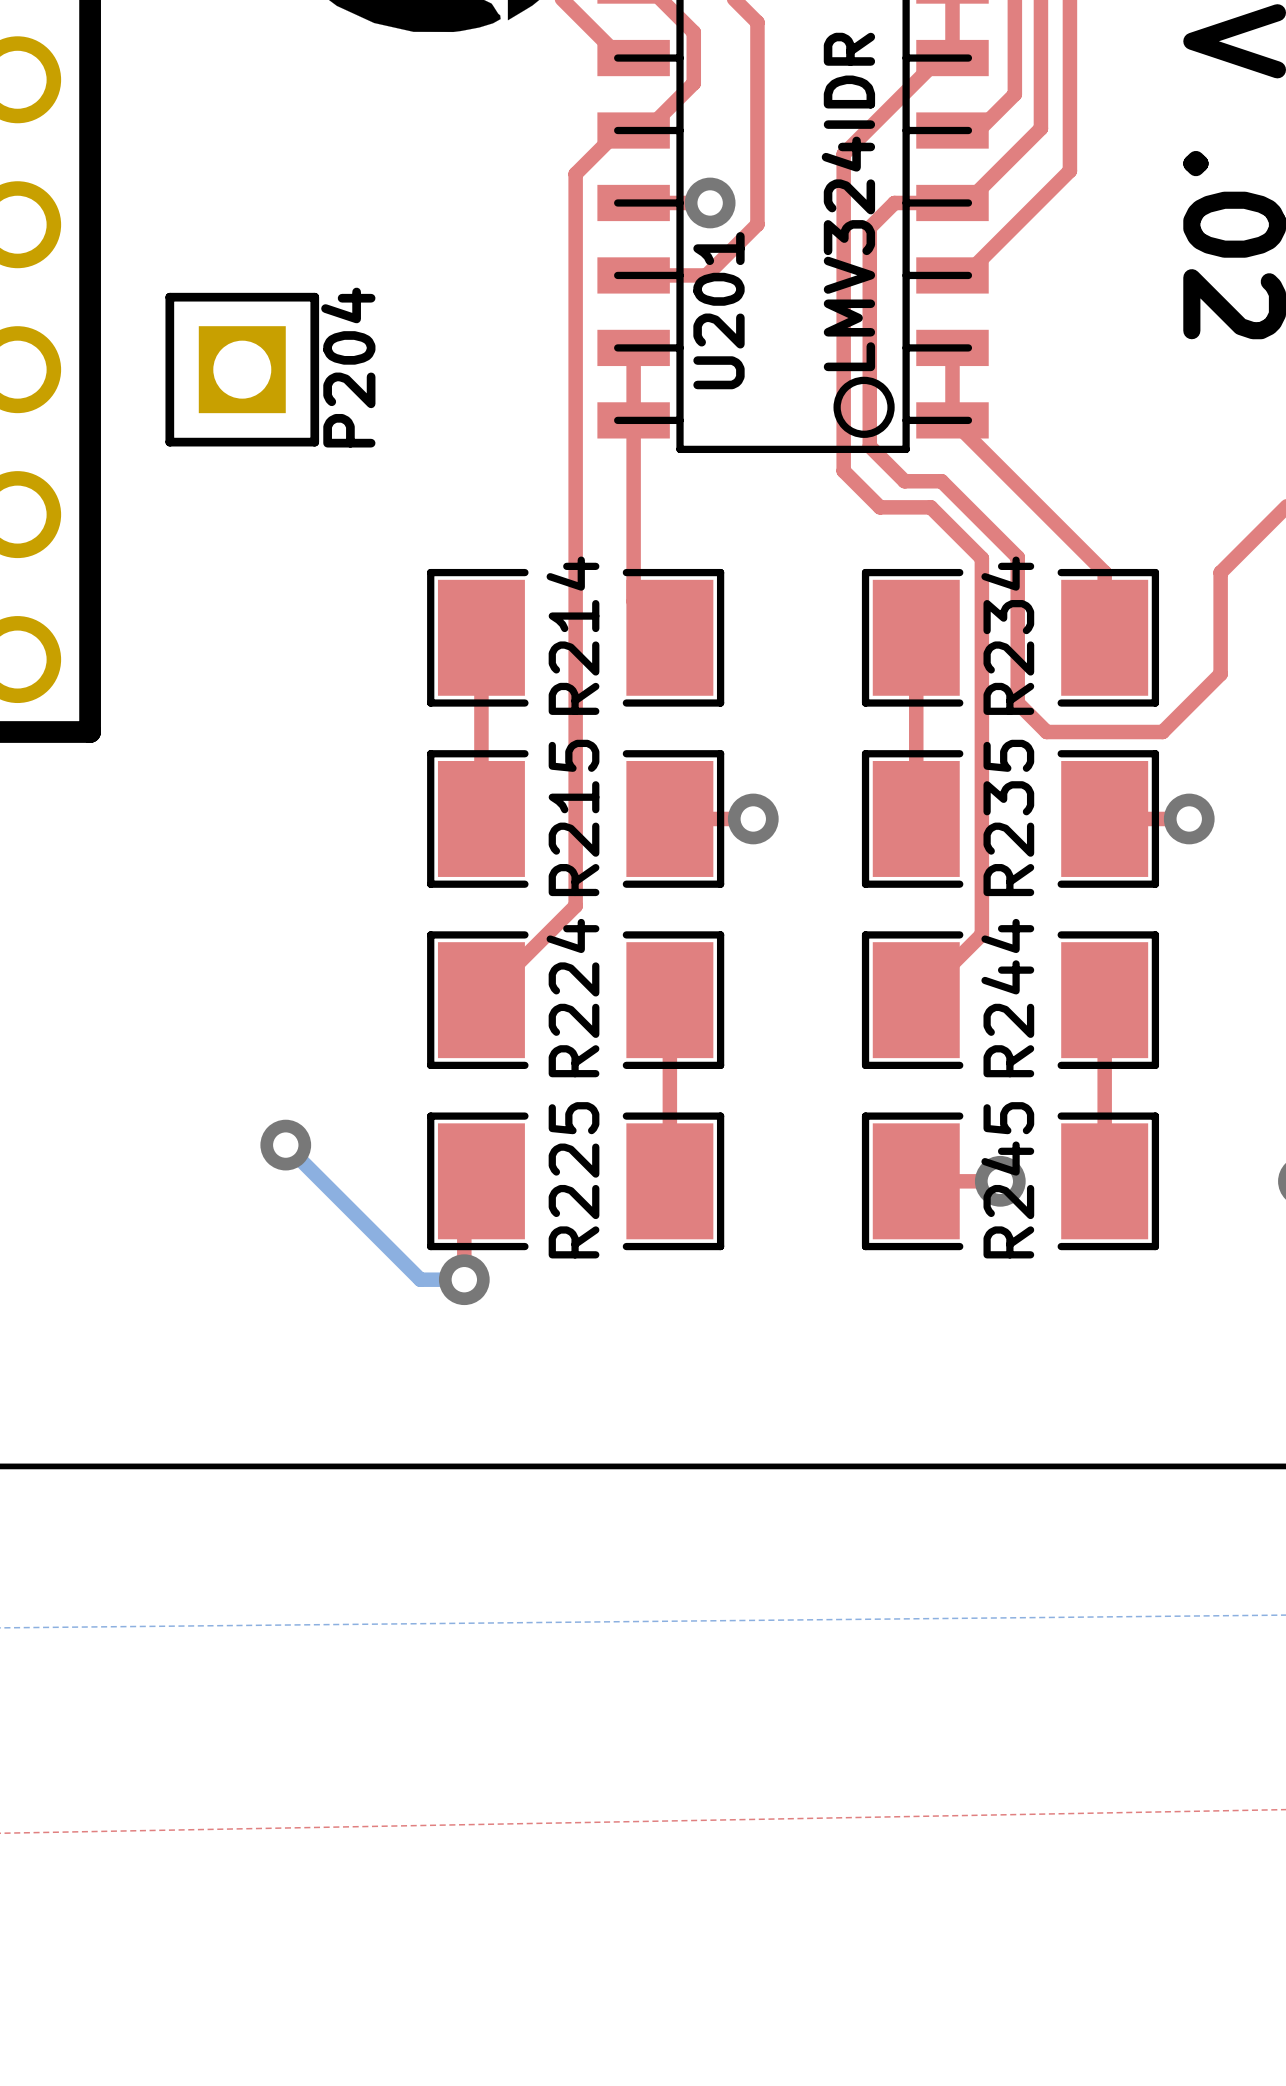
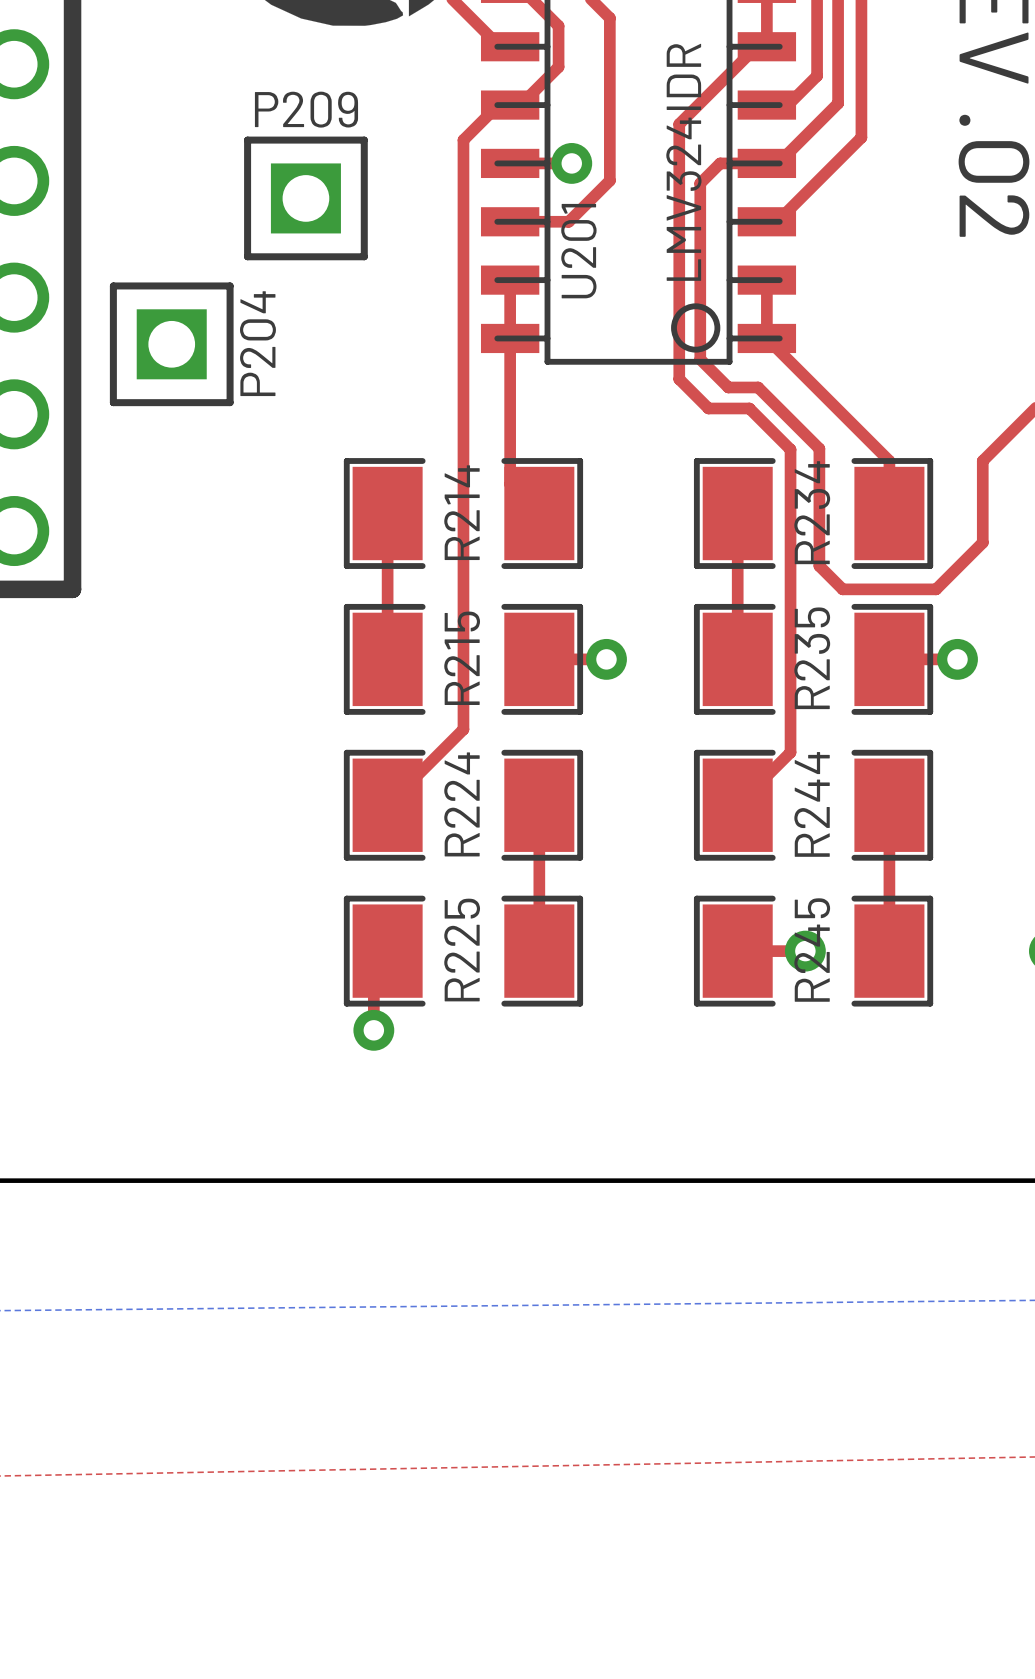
P209: none -> (305, 198)
P204 position: (242, 369) -> (171, 344)
bottom track: (285, 1145) (420, 1279) (464, 1279) -> none
via: (285, 1145) -> none

